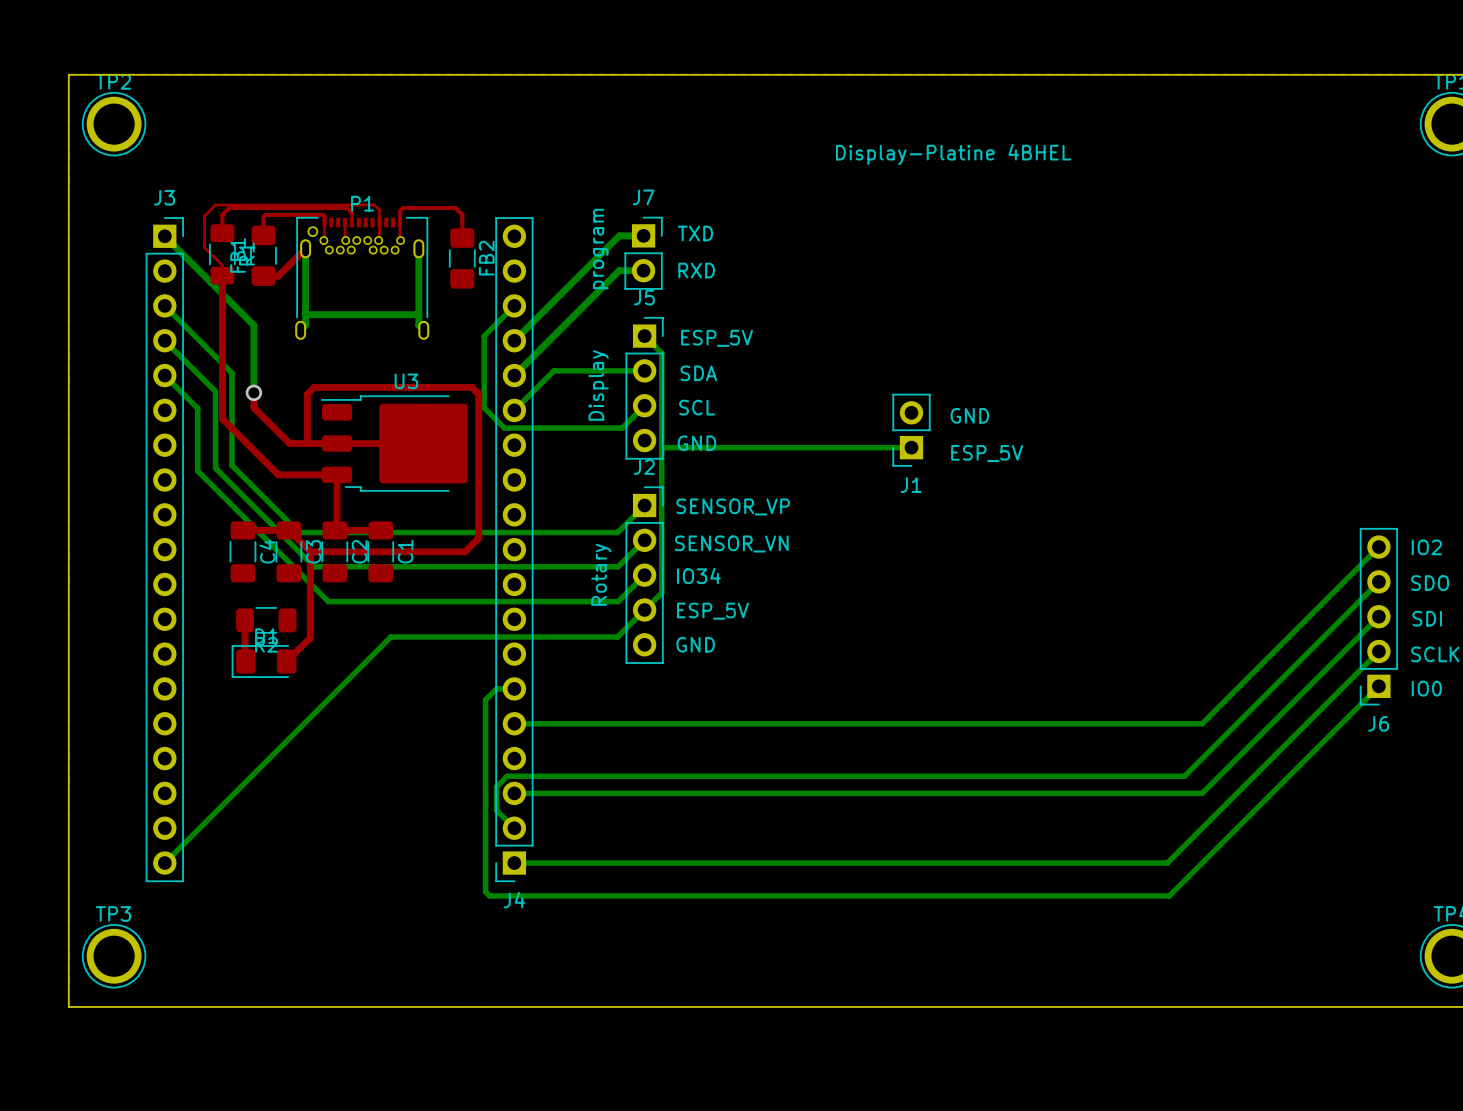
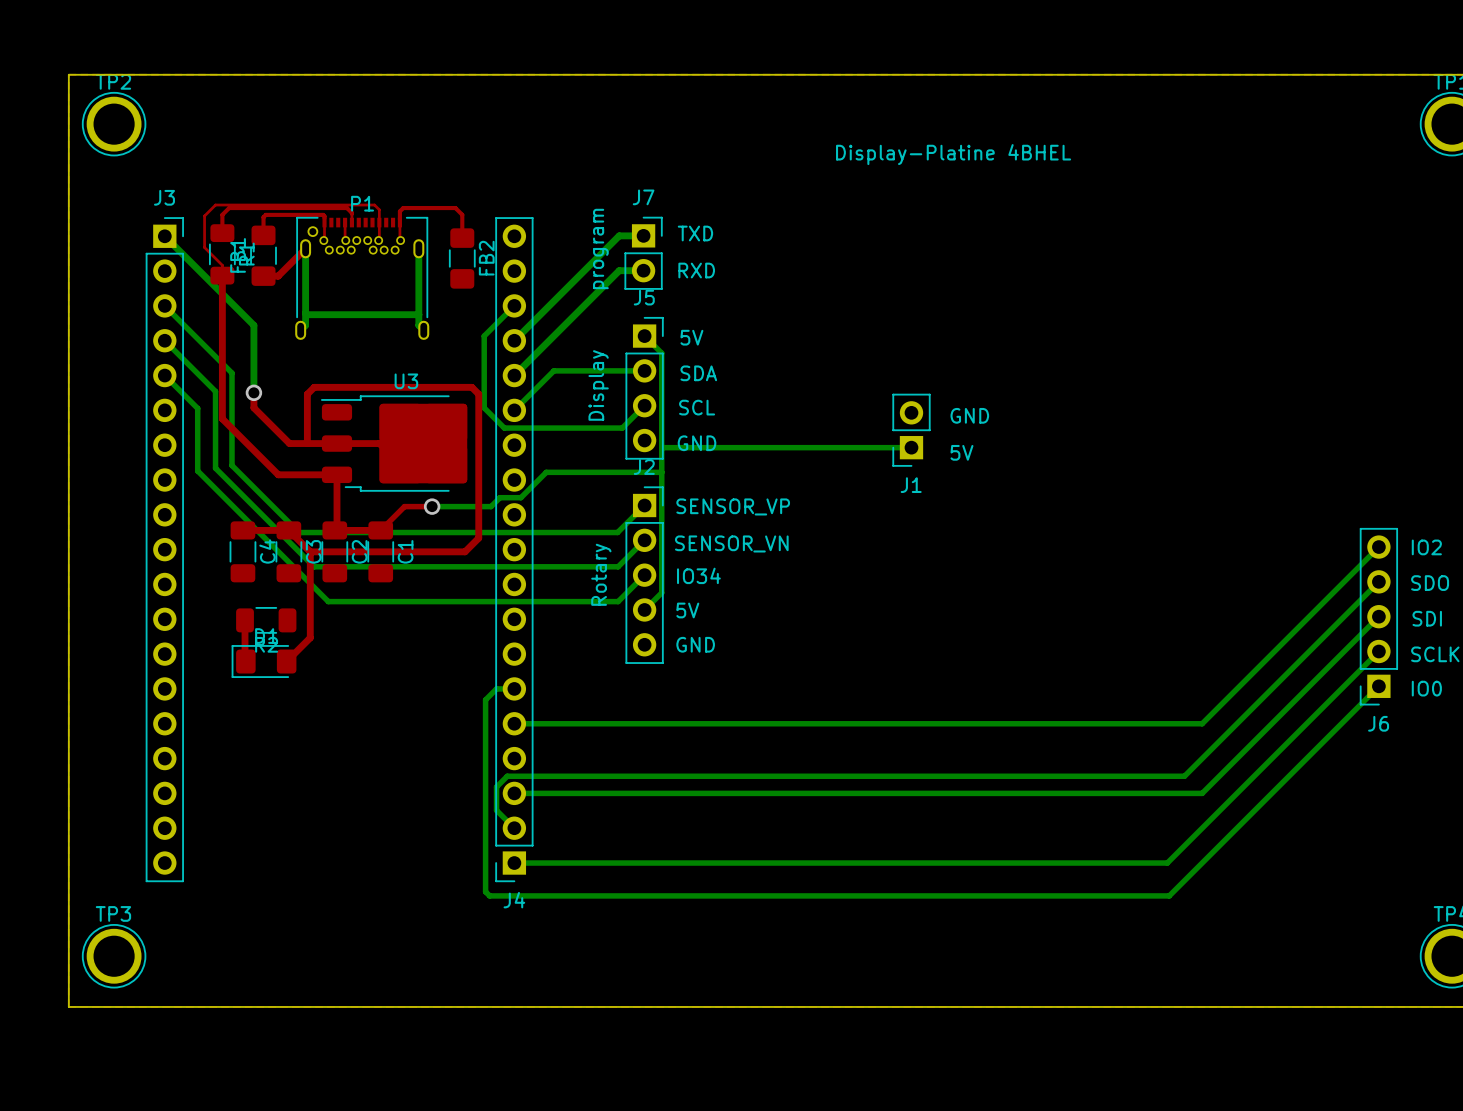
text: ESP_5V (717, 338) -> 5V (691, 337)
text: ESP_5V (987, 453) -> 5V (961, 452)
bottom track: none -> (661, 472) (546, 472) (520, 497) (499, 497) (491, 506) (432, 506)
top track: none -> (432, 506) (404, 506) (380, 530)
via: none -> (432, 506)
bottom track: (644, 609) (617, 636) (390, 636) (164, 863) -> none
text: ESP_5V (712, 611) -> 5V (687, 610)

